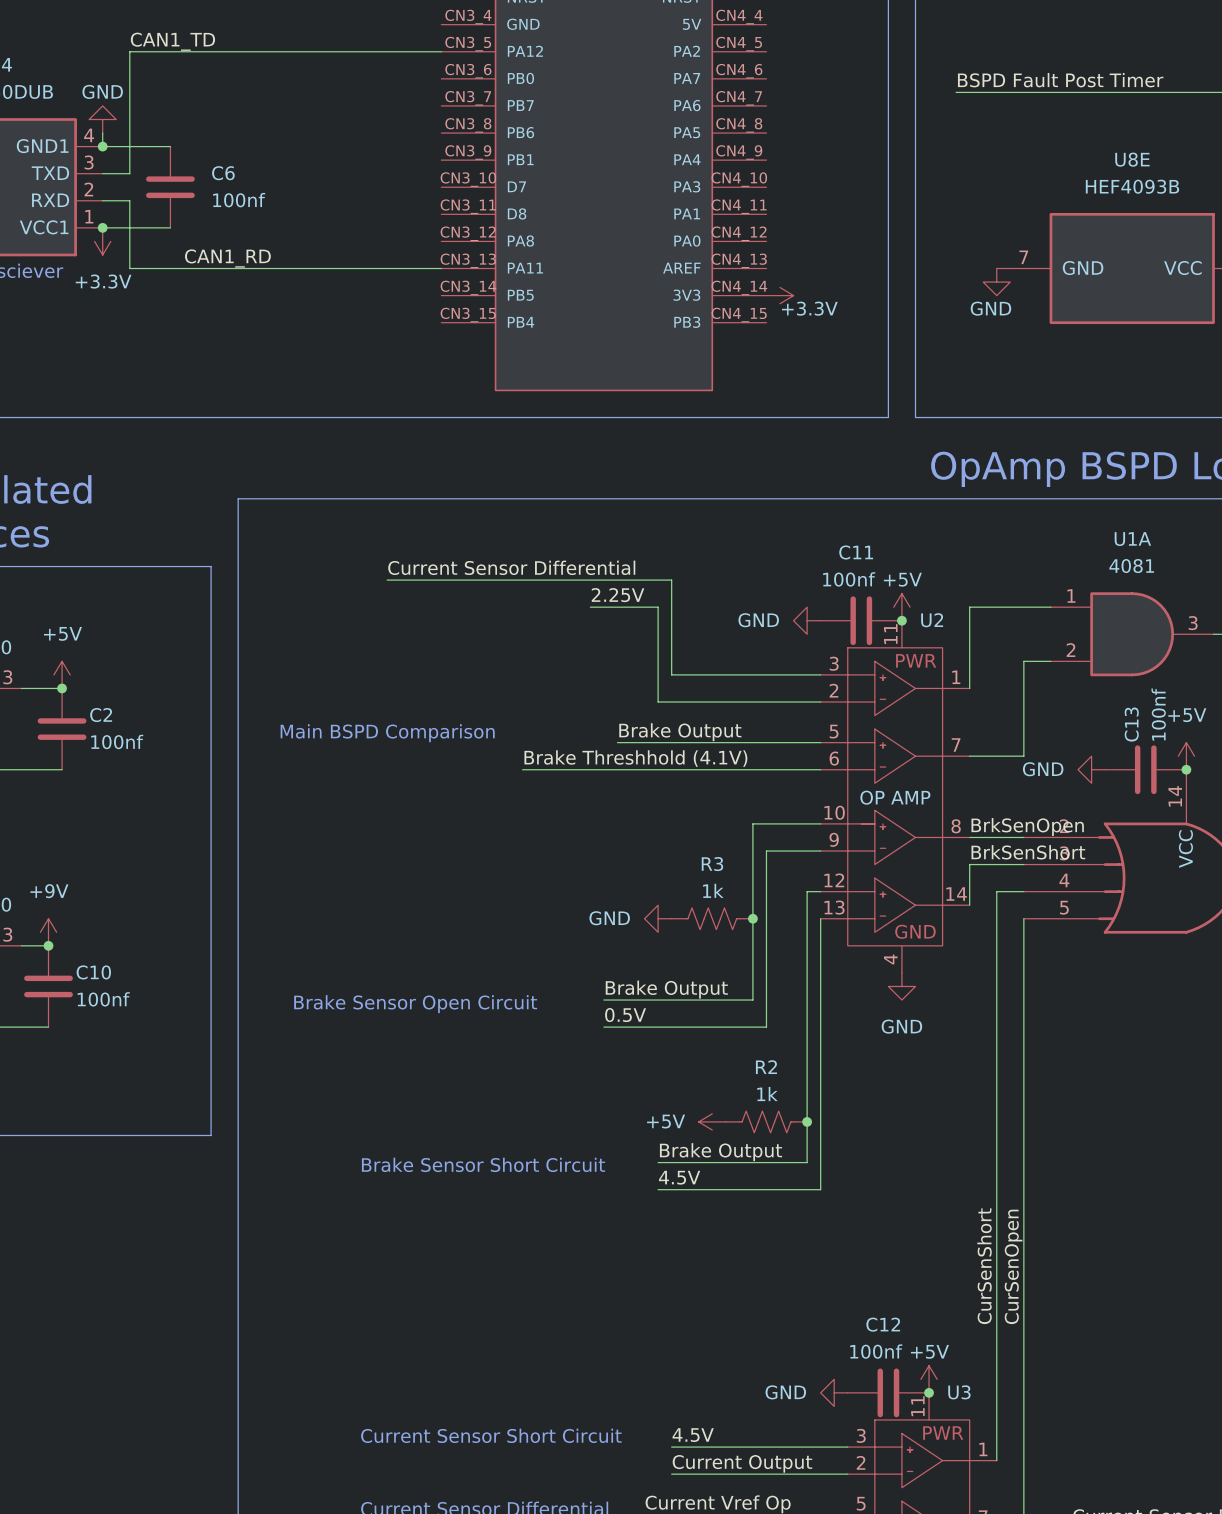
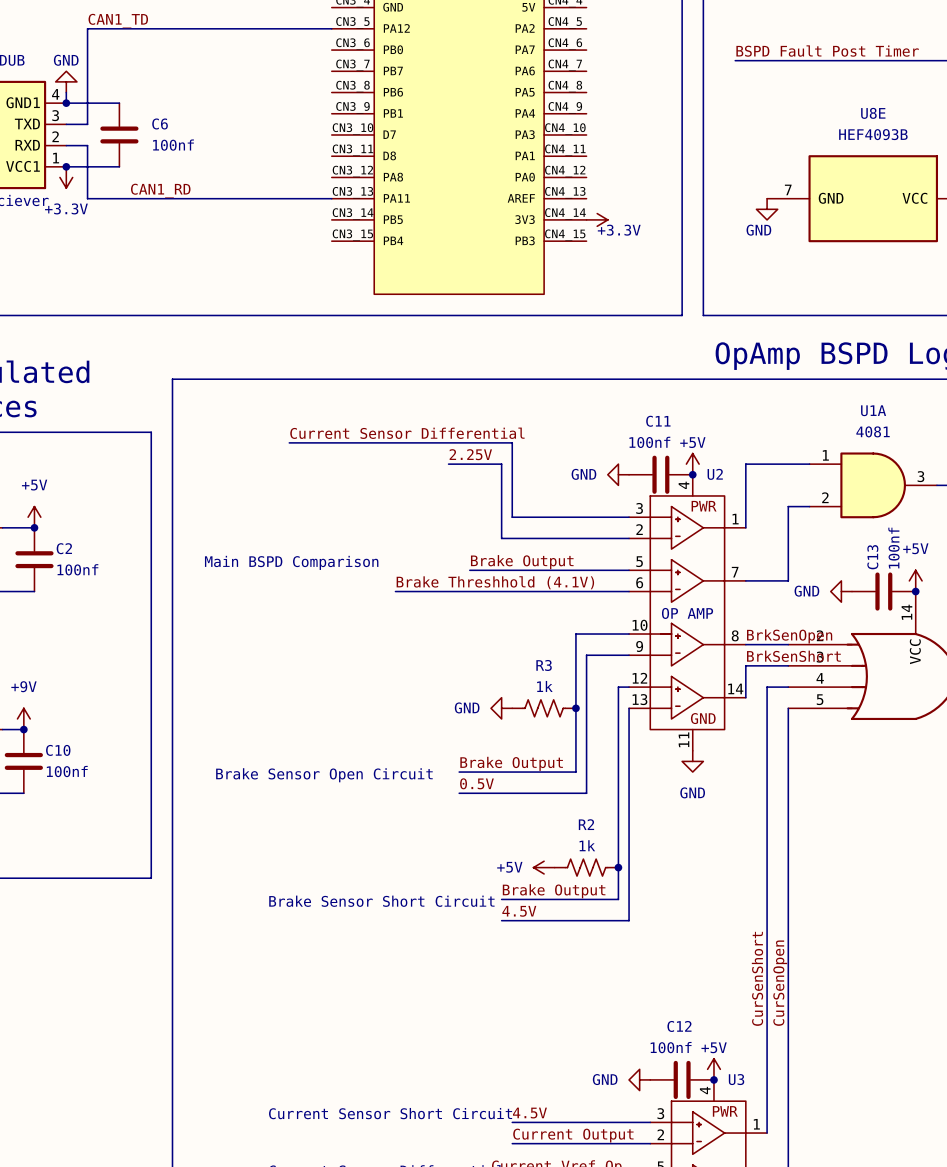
U2 pin number: 11 (890, 634) -> 4 (683, 485)
U2 pin number: 4 (890, 959) -> 11 (683, 739)
U3 pin number: 11 (917, 1406) -> 4 (705, 1090)

